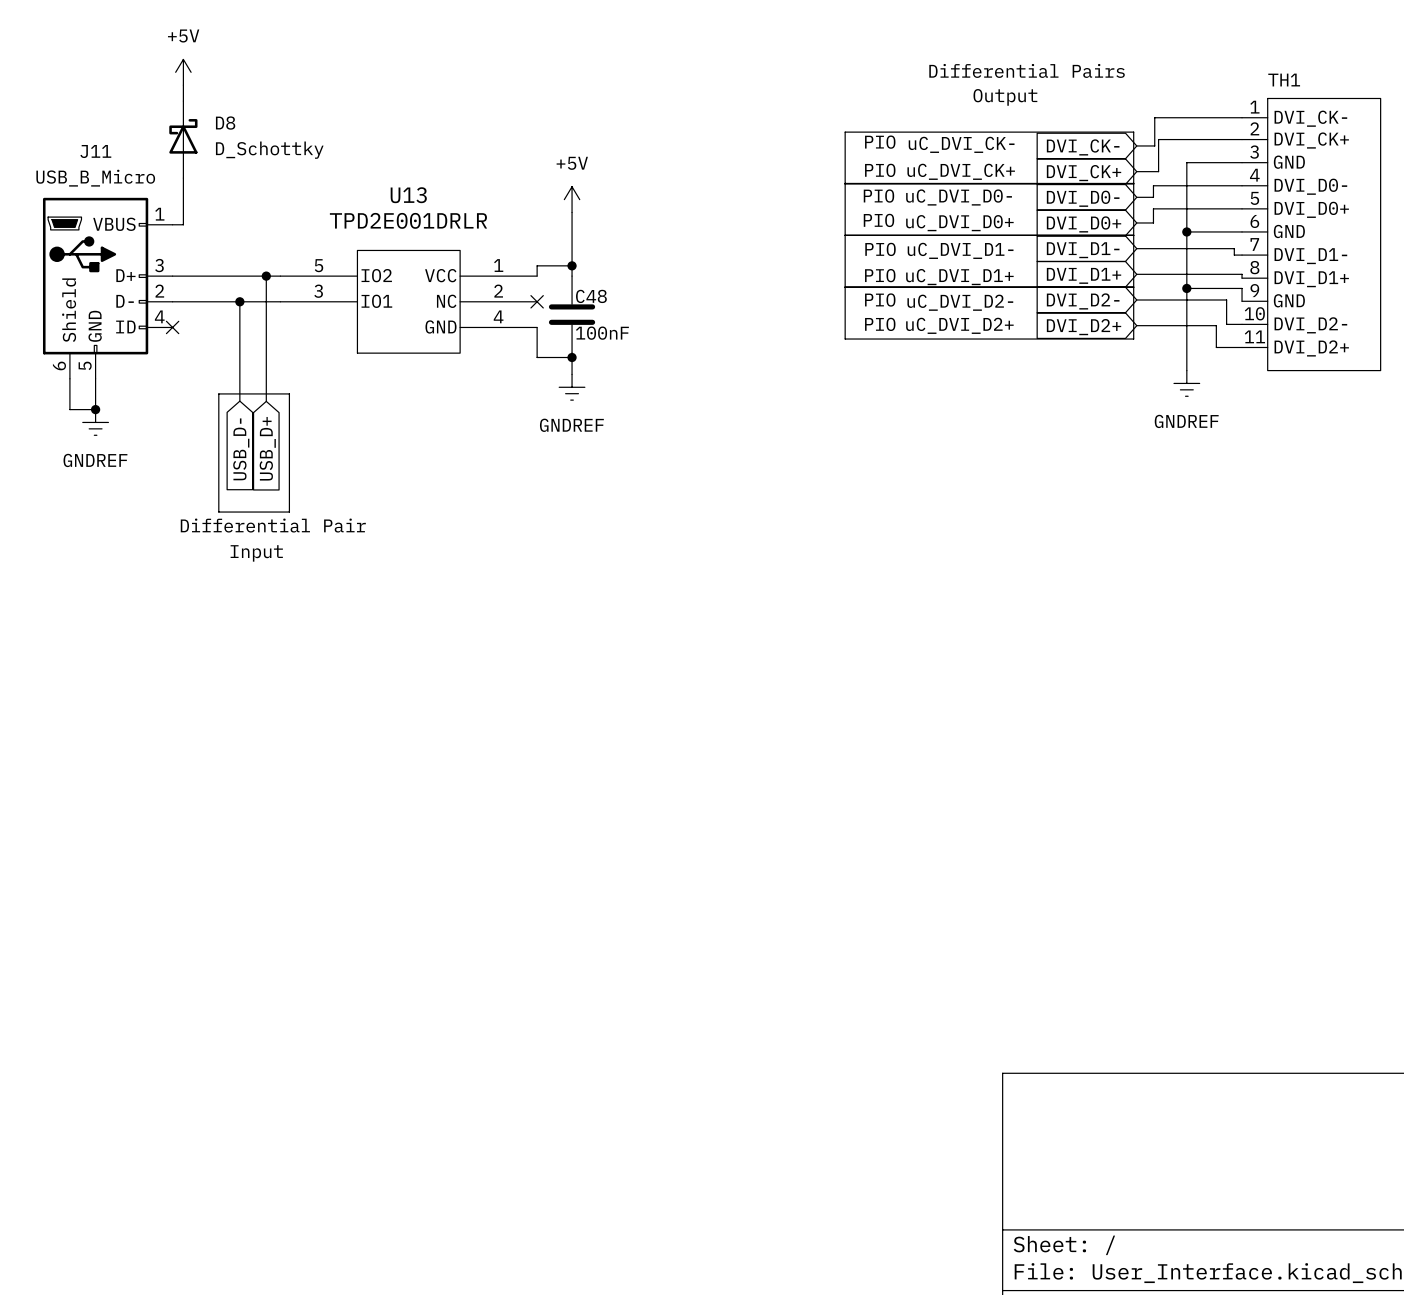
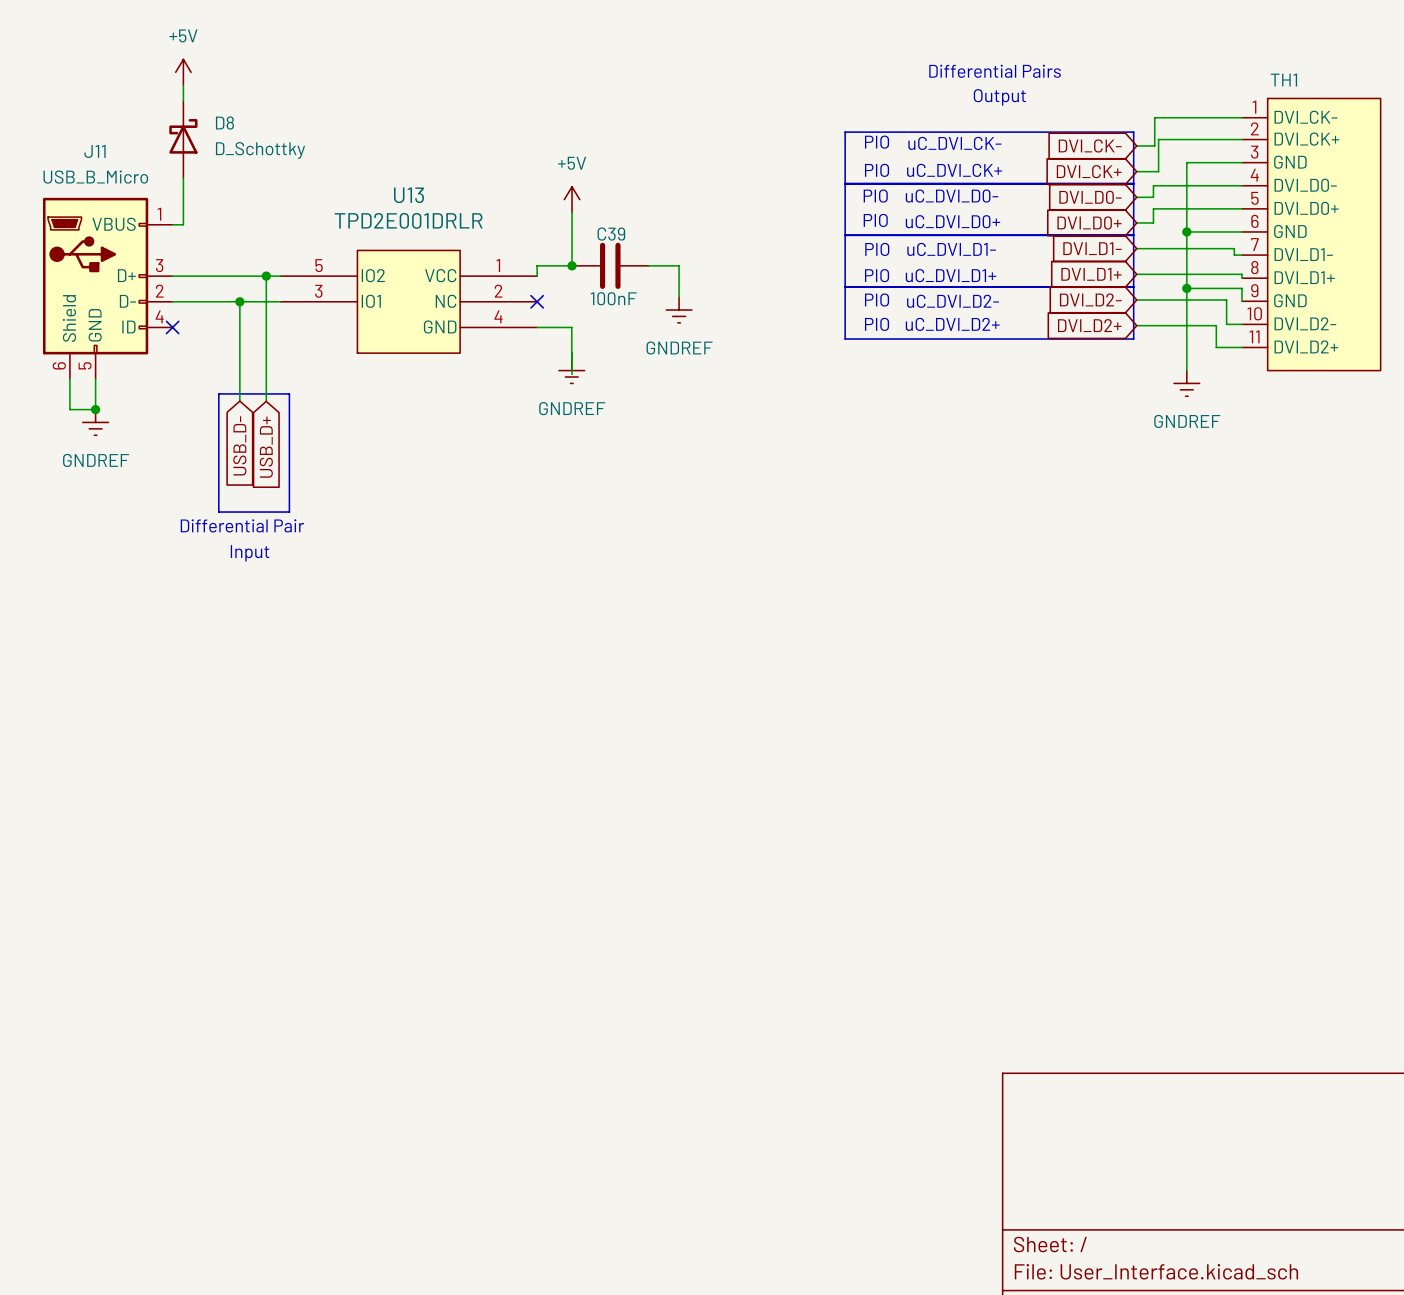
wire: (572, 265) (572, 276) -> none
C39: none -> 100nF (610, 265)
wire: none -> (648, 265) (679, 265) (679, 297)
power symbol: none -> GNDREF (679, 310)
C48: 100nF (572, 314) -> none
wire: (537, 327) (537, 357) (572, 357) -> (537, 327) (571, 327) (571, 357)
junction: (572, 357) -> none
power symbol position: GNDREF (572, 387) -> GNDREF (571, 370)

